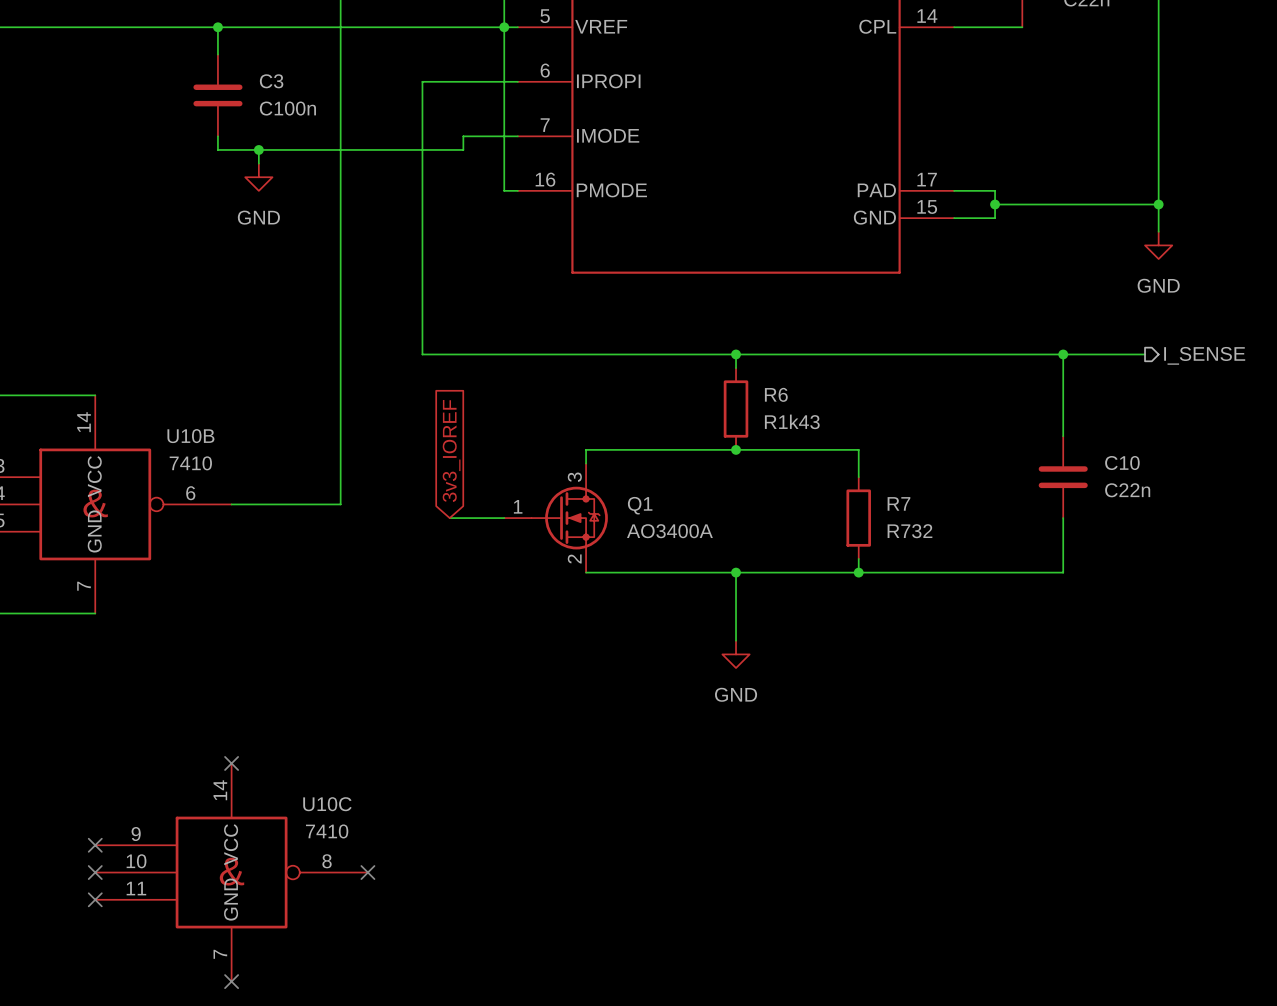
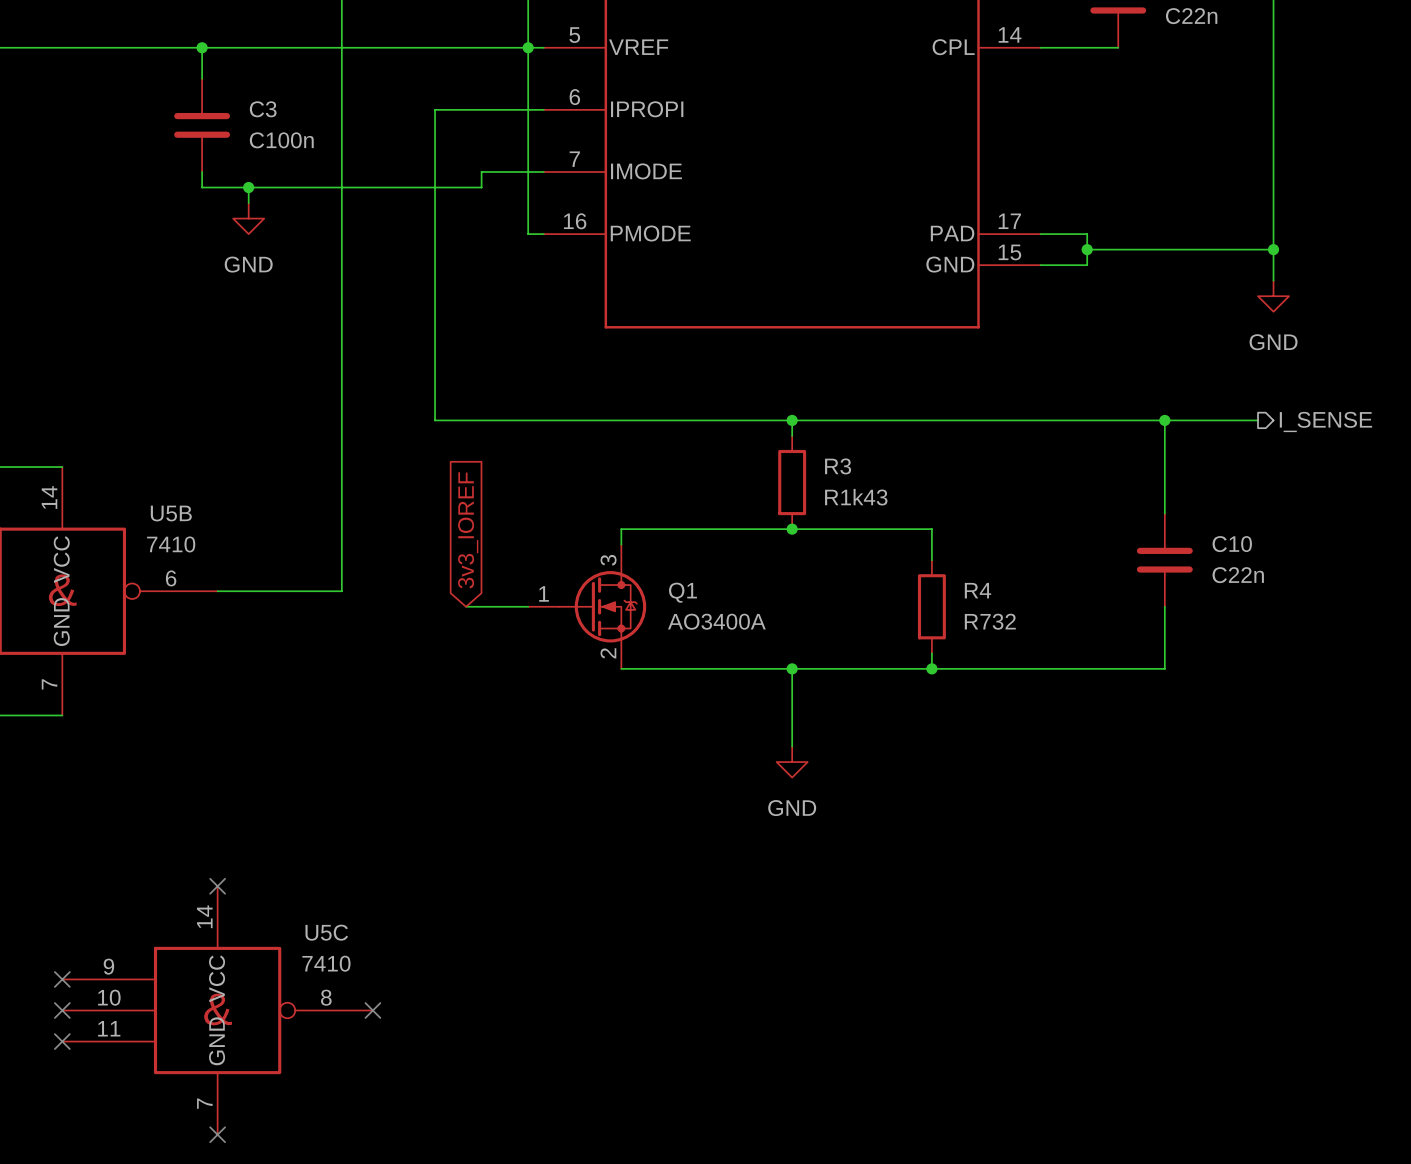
R6 name: R6 (776, 394) -> R3 (838, 466)
U10B name: U10B (190, 436) -> U5B (171, 513)
R7 name: R7 (898, 503) -> R4 (977, 590)
U10C name: U10C (327, 804) -> U5C (326, 932)

